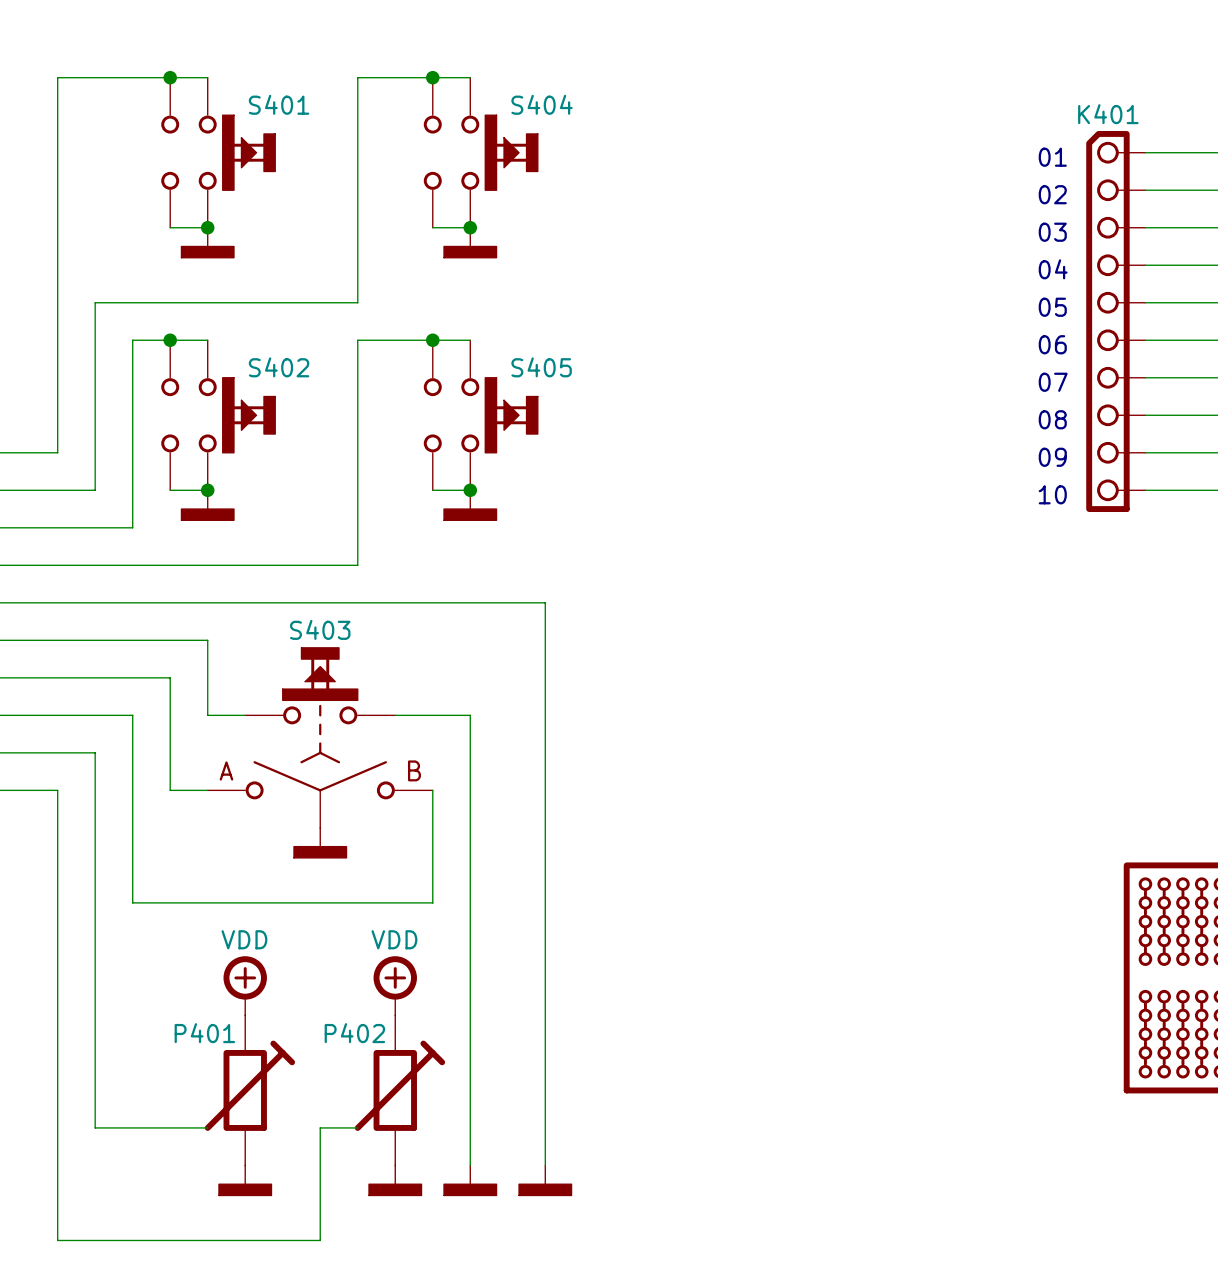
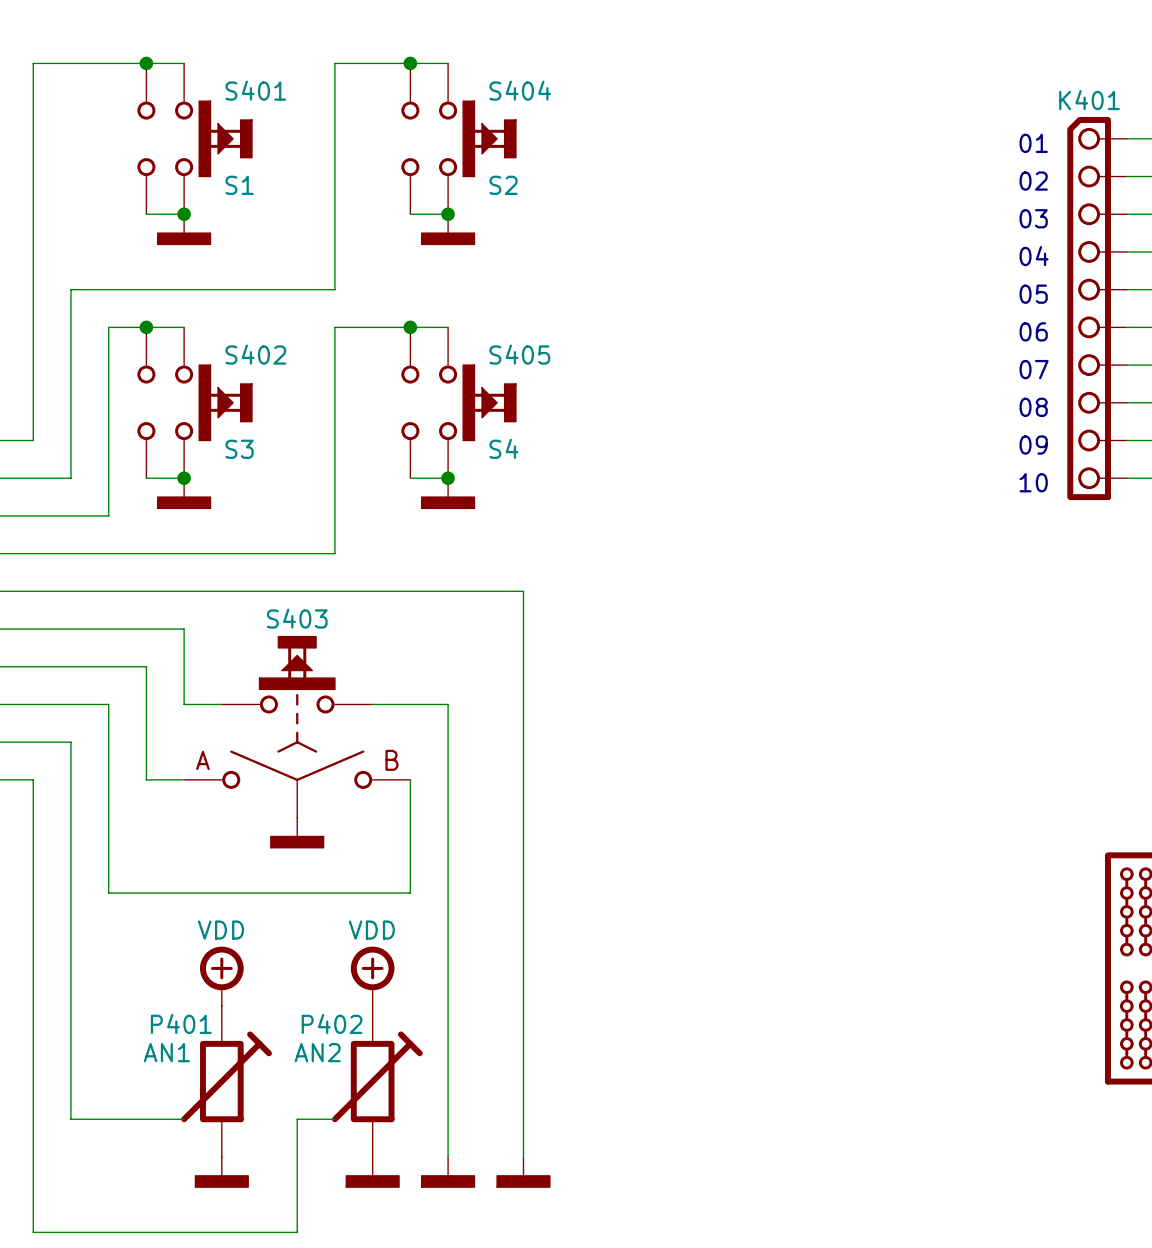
S401 value: none -> S1 (239, 185)
S404 value: none -> S2 (503, 185)
S402 value: none -> S3 (239, 449)
S405 value: none -> S4 (503, 448)
P401 value: none -> AN1 (166, 1052)
P402 value: none -> AN2 (317, 1052)

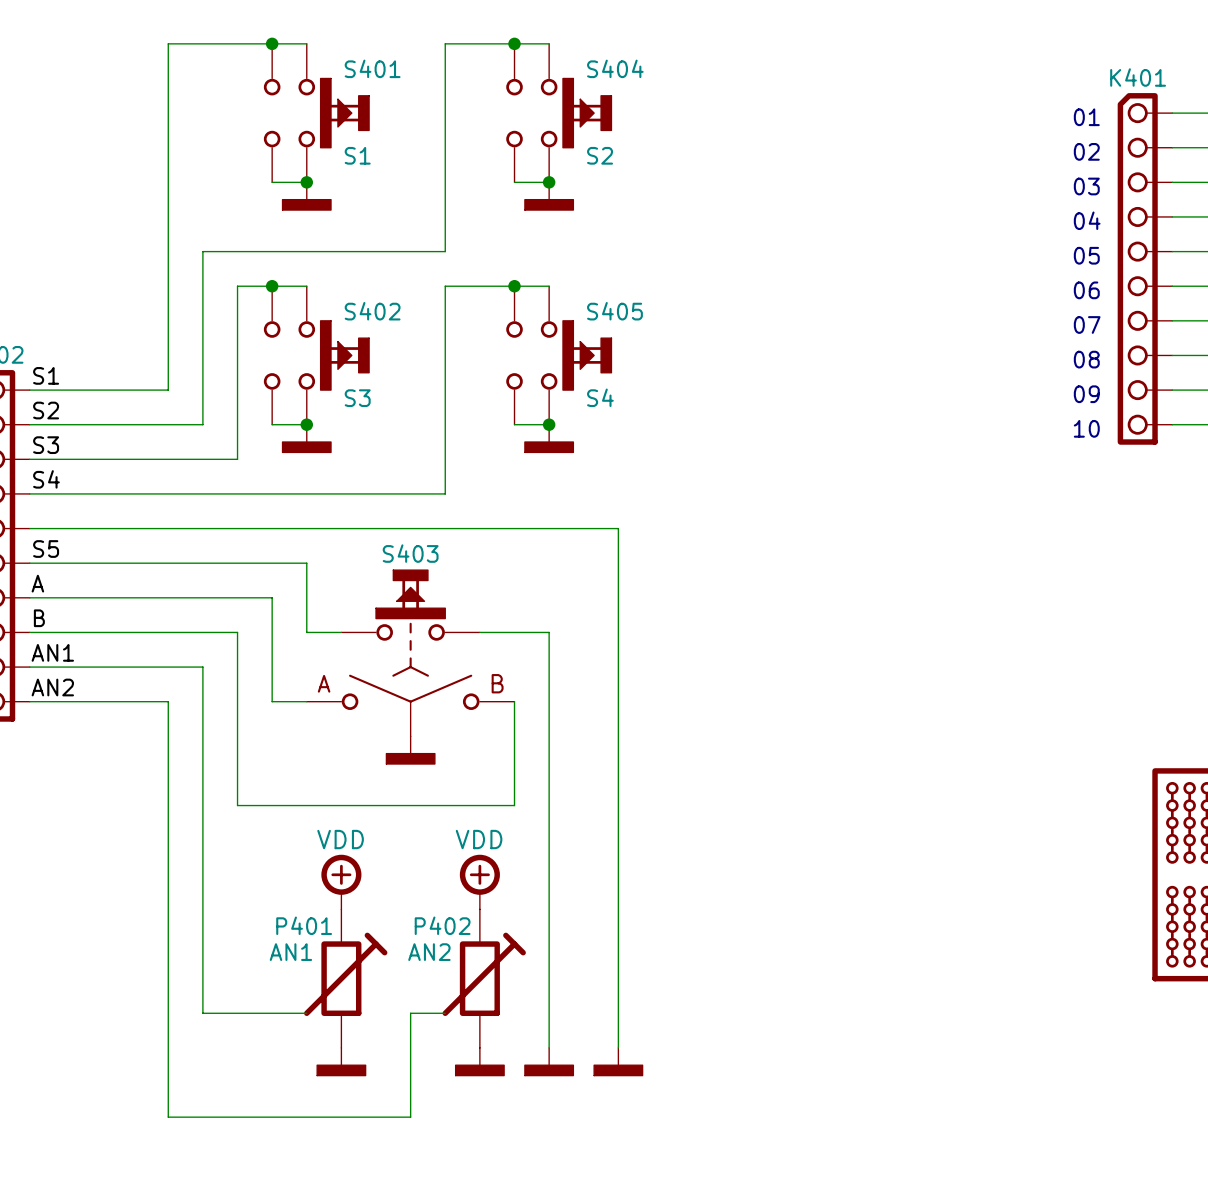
power symbol text: none -> VDD (340, 839)
power symbol text: VDD (221, 930) -> none
power symbol text: none -> VDD (479, 839)
power symbol text: VDD (371, 930) -> none

